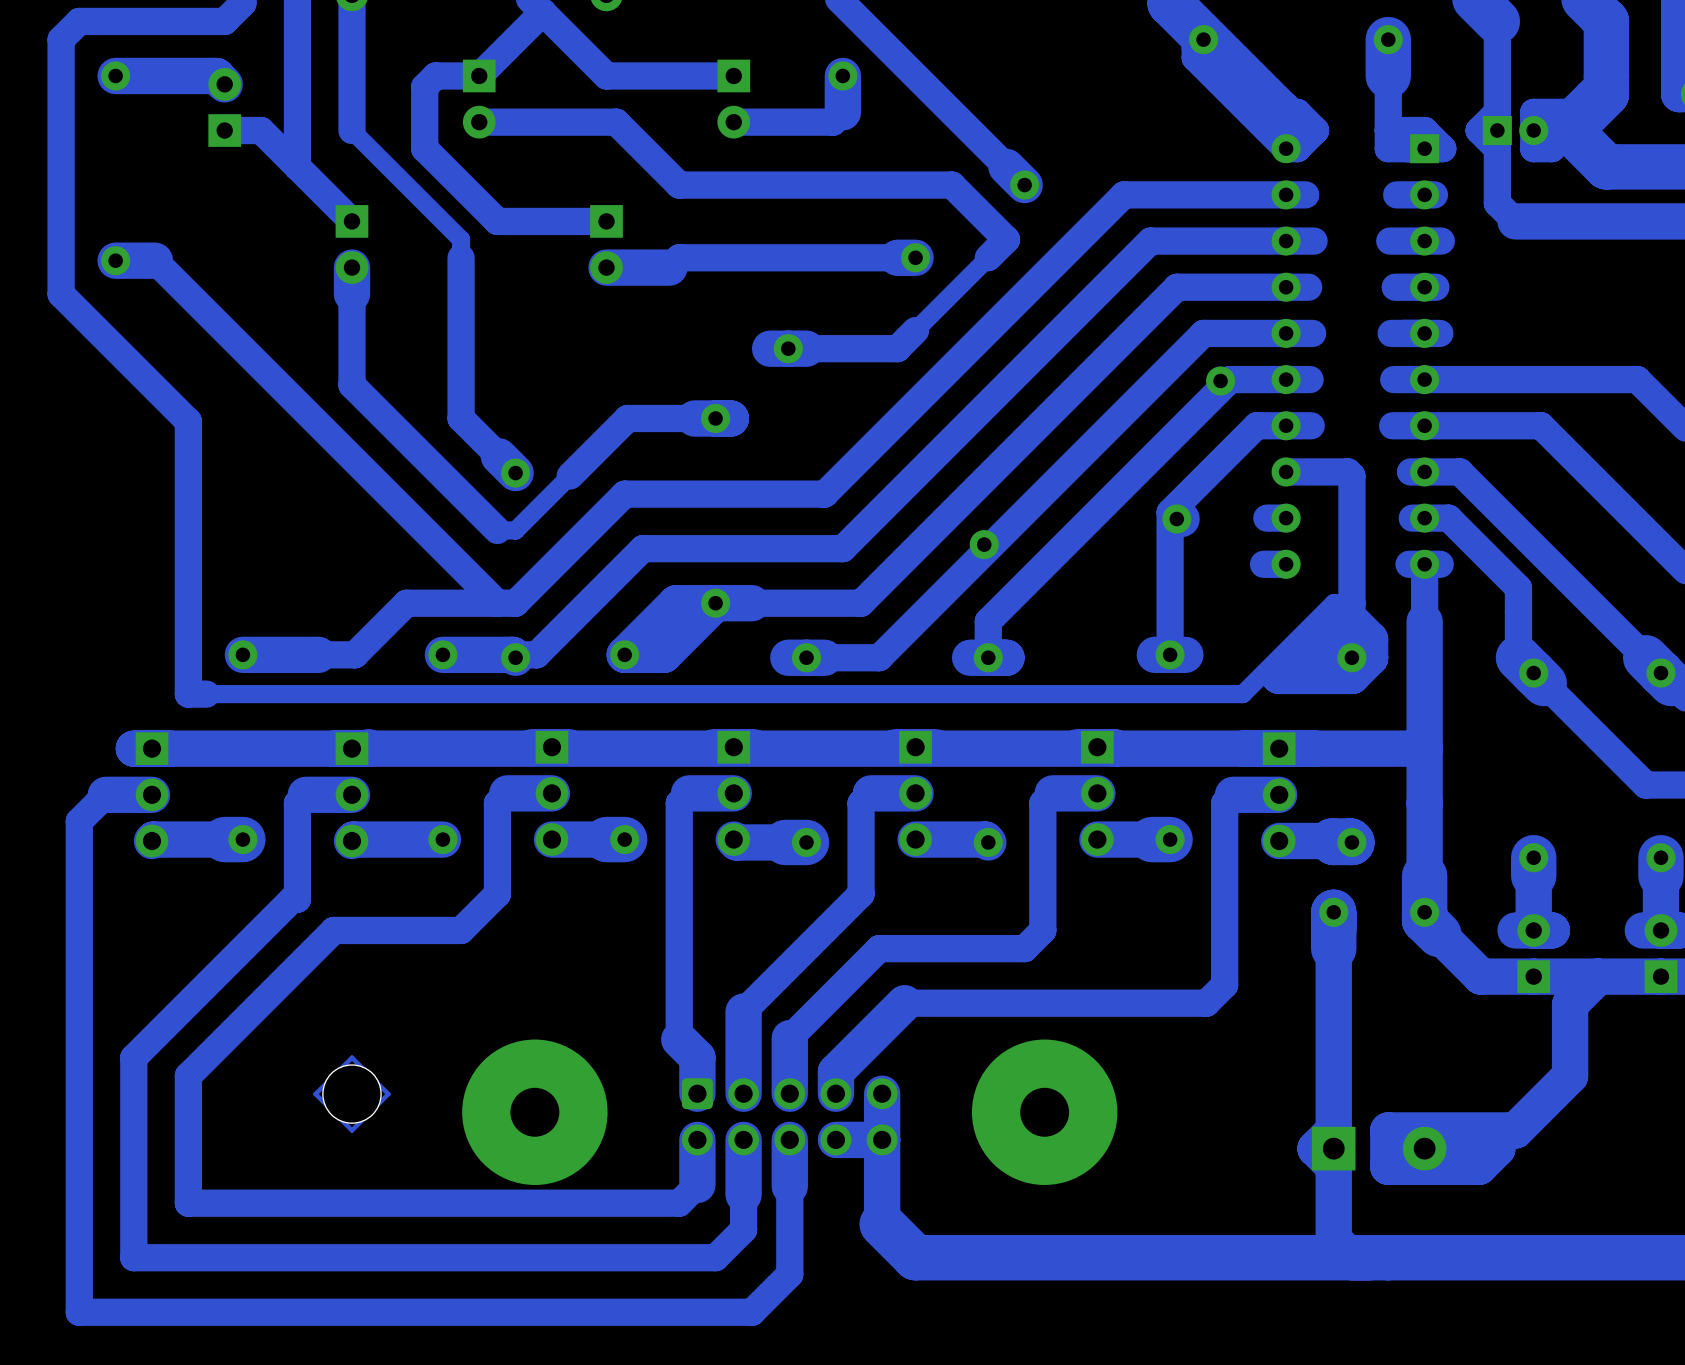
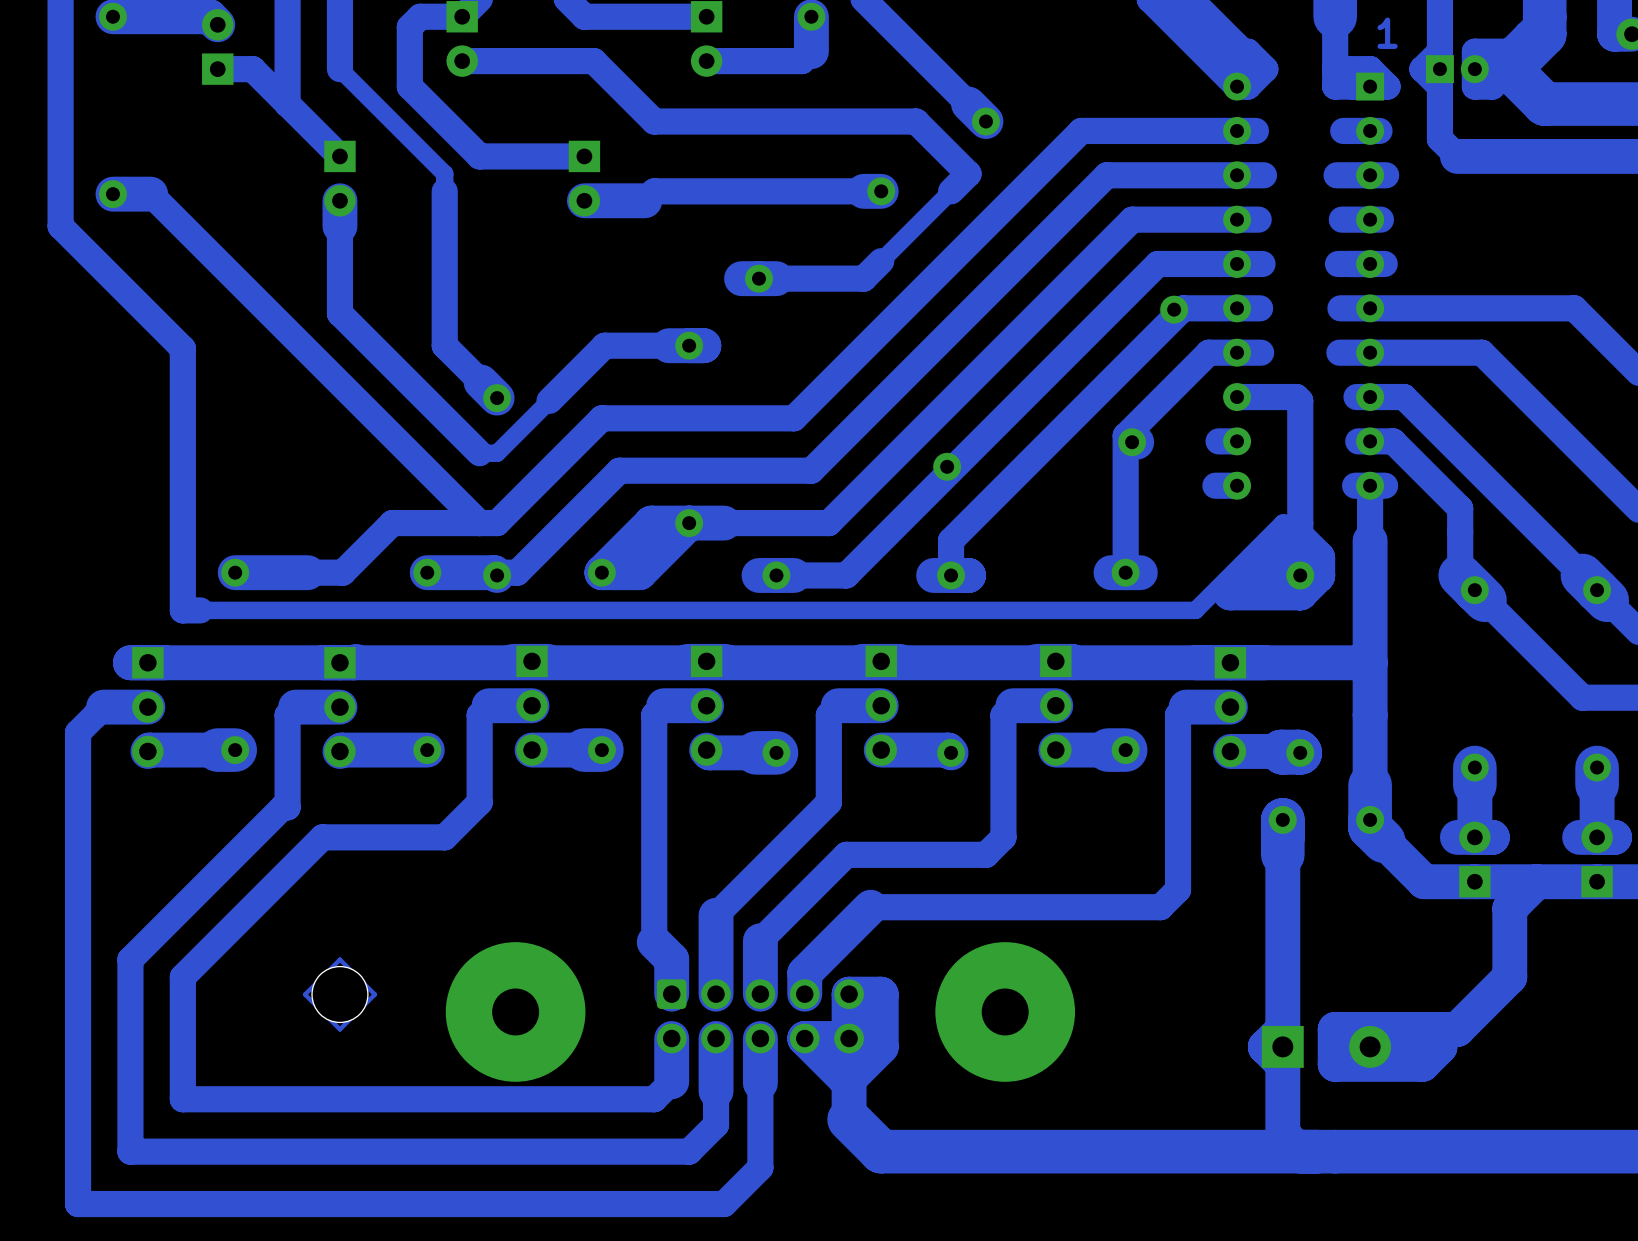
text: none -> 1 (1387, 33)
track: none -> (849, 994) (881, 994) (881, 1046) (849, 1079) (845, 1079) (804, 1038)

